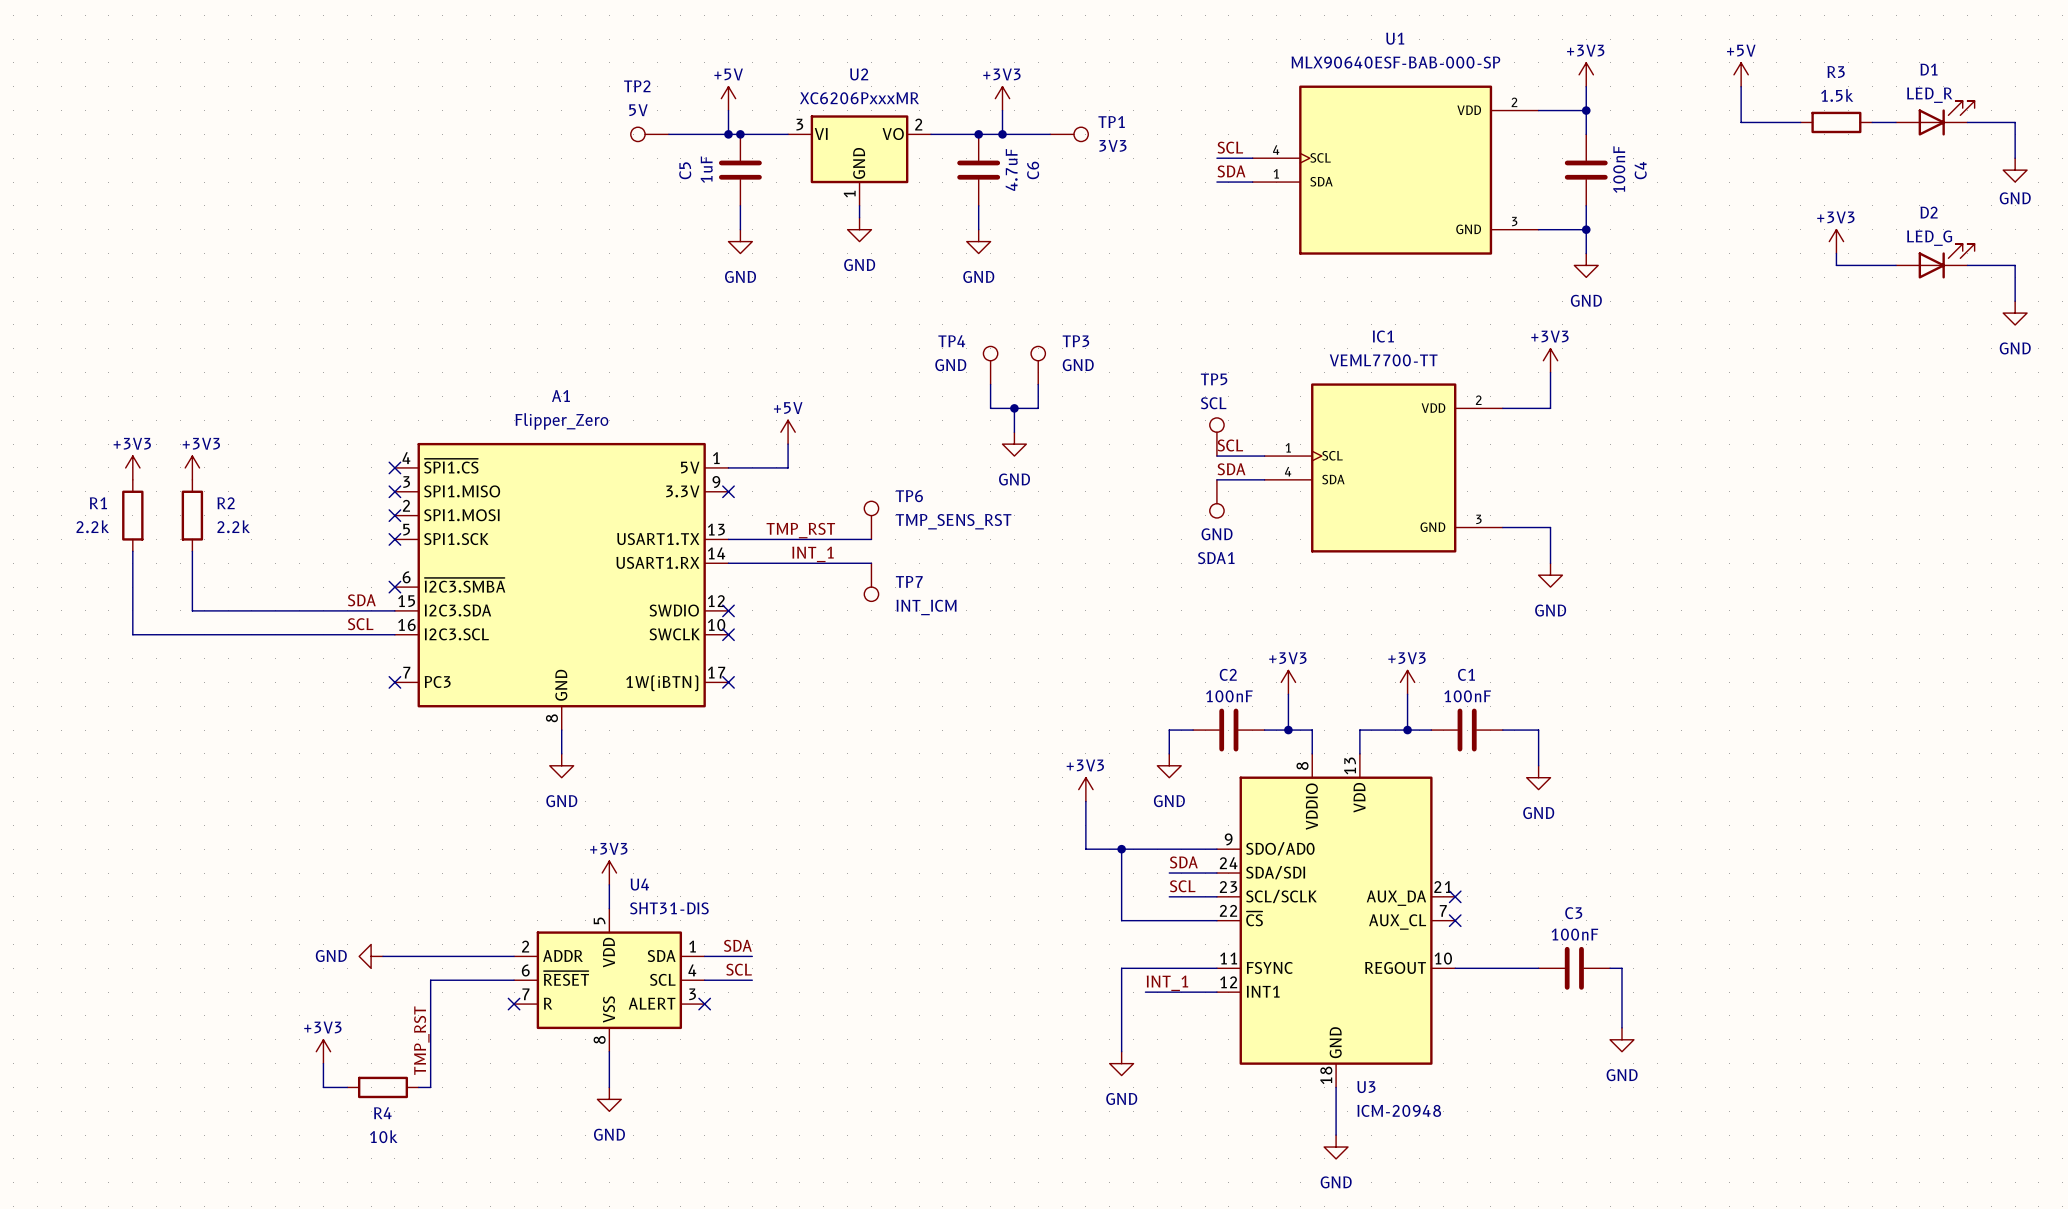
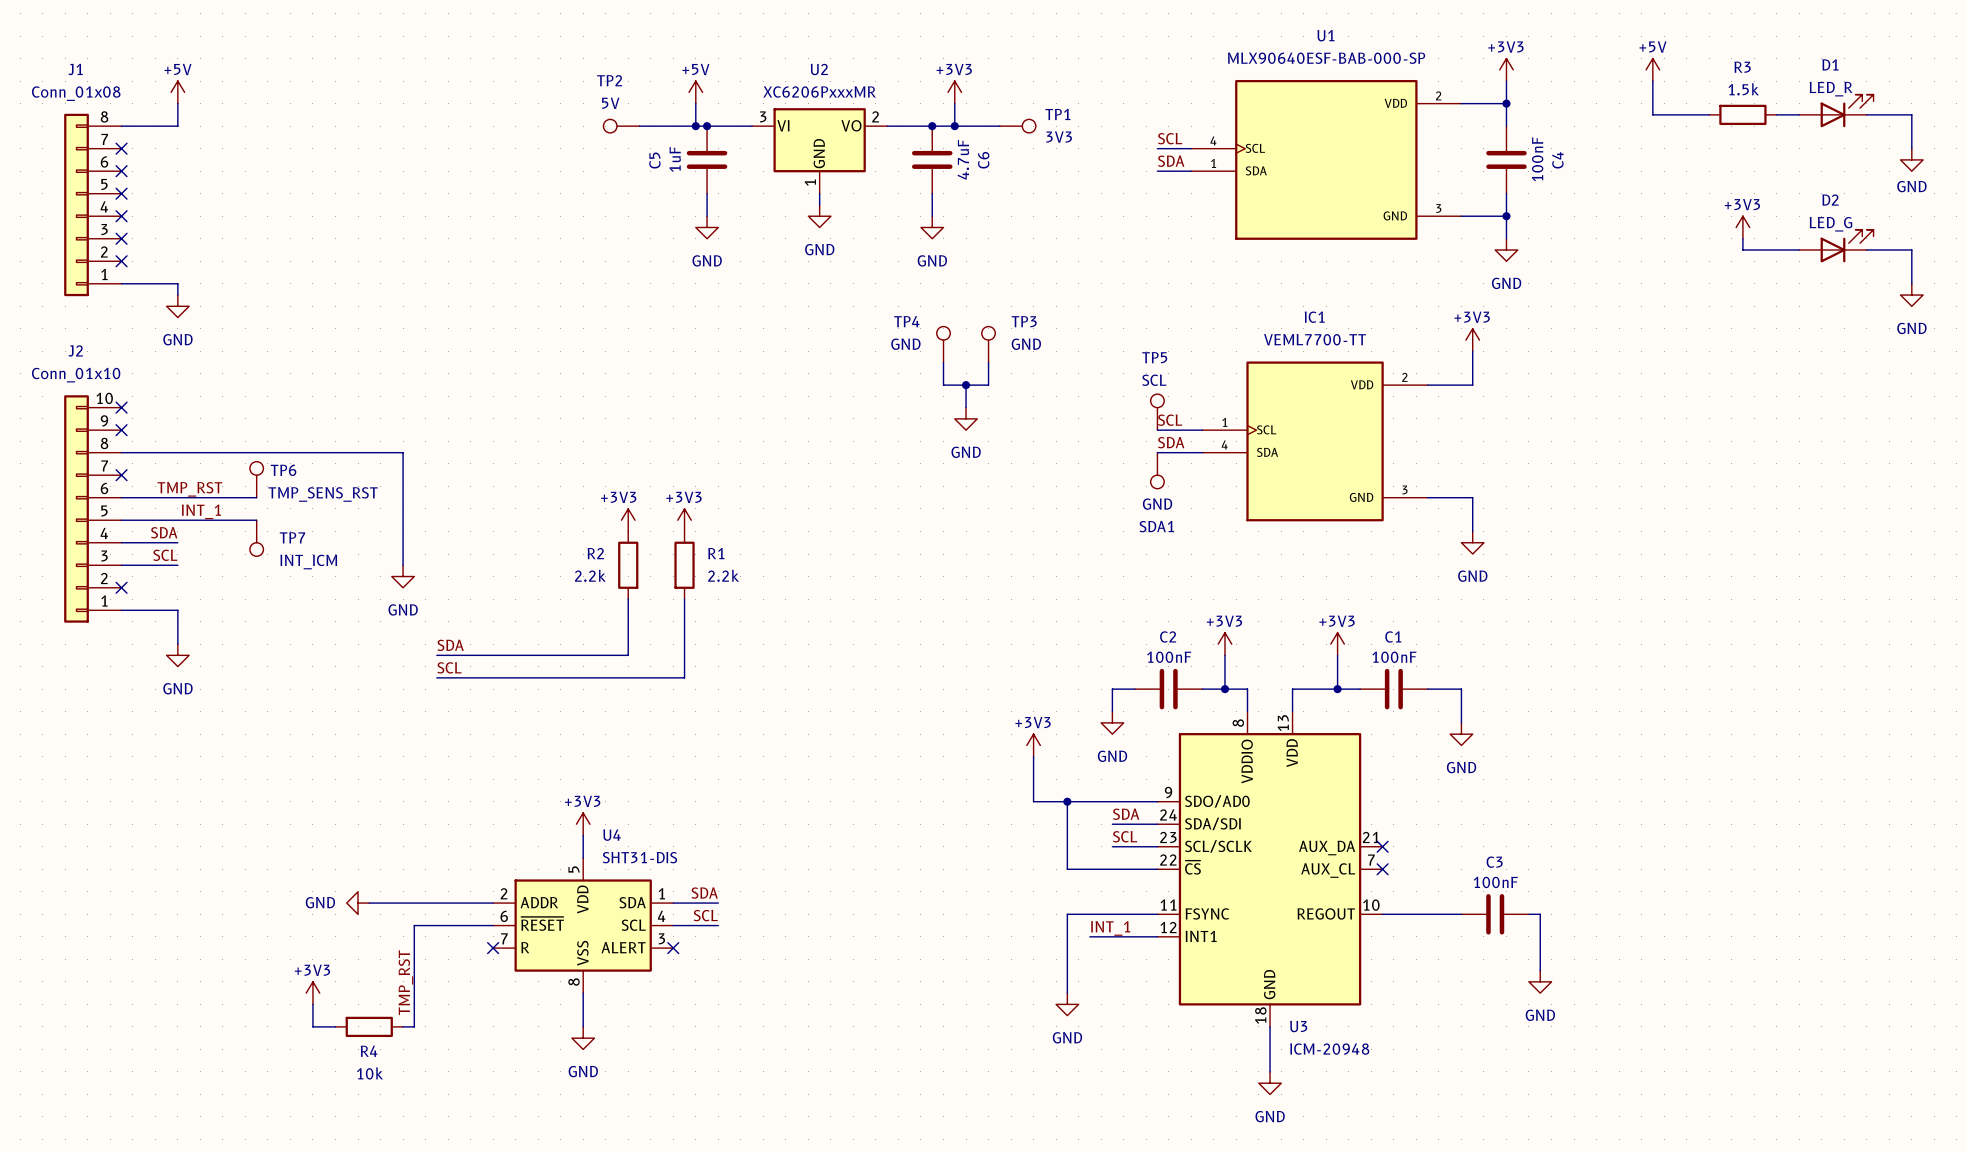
power symbol: none -> +5V (177, 92)
wire: none -> (177, 103) (177, 126) (121, 126)
no-connect mark: none -> (121, 148)
no-connect mark: none -> (121, 171)
no-connect mark: none -> (121, 193)
J1: none -> Conn_01x08 (92, 204)
no-connect mark: none -> (121, 216)
no-connect mark: none -> (121, 238)
no-connect mark: none -> (121, 261)
wire: none -> (121, 283) (177, 283) (177, 295)
power symbol: none -> GND (177, 306)
no-connect mark: none -> (121, 407)
power symbol: +5V (788, 432) -> none
wire: (788, 444) (788, 467) (728, 467) -> none
no-connect mark: none -> (121, 430)
power symbol: +3V3 (132, 467) -> none
power symbol: +3V3 (192, 467) -> none
no-connect mark: (394, 467) -> none
wire: none -> (121, 452) (403, 452) (403, 565)
no-connect mark: (394, 491) -> none
no-connect mark: (728, 491) -> none
TP6 name position: TP6 (909, 496) -> TP6 (283, 470)
R1 name position: R1 (98, 503) -> R1 (716, 553)
no-connect mark: none -> (121, 475)
R2 name position: R2 (226, 503) -> R2 (595, 553)
R1 position: (132, 515) -> (684, 565)
R2 position: (192, 515) -> (628, 565)
no-connect mark: (394, 515) -> none
label: none -> TMP_RST (189, 489)
TP6 position: (871, 520) -> (256, 479)
TP6 value position: TMP_SENS_RST (953, 521) -> TMP_SENS_RST (323, 494)
R1 value position: 2.2k (92, 526) -> 2.2k (723, 575)
R2 value position: 2.2k (233, 526) -> 2.2k (590, 575)
wire: none -> (121, 497) (256, 497)
label: TMP_RST (800, 530) -> none
J2: none -> Conn_01x10 (92, 508)
no-connect mark: (394, 539) -> none
wire: (728, 539) (871, 539) -> none
label: none -> INT_1 (201, 511)
wire: none -> (121, 520) (256, 520)
wire: (132, 551) (132, 634) (394, 634) -> none
wire: (192, 551) (192, 610) (394, 610) -> none
power symbol: none -> +3V3 (628, 520)
power symbol: none -> +3V3 (684, 520)
label: INT_1 (813, 554) -> none
wire: (728, 563) (871, 563) -> none
label: none -> SDA (164, 532)
wire: none -> (121, 542) (177, 542)
TP7 position: (871, 582) -> (256, 538)
A1: Flipper_Zero (561, 586) -> none
no-connect mark: (394, 587) -> none
label: none -> SCL (165, 555)
wire: none -> (121, 565) (177, 565)
label: SDA (361, 600) -> none
power symbol: none -> GND (403, 576)
no-connect mark: (728, 610) -> none
no-connect mark: none -> (121, 587)
label: SCL (360, 624) -> none
wire: none -> (684, 599) (684, 677) (436, 677)
no-connect mark: (728, 634) -> none
wire: none -> (121, 610) (177, 610) (177, 644)
no-connect mark: (394, 682) -> none
no-connect mark: (728, 682) -> none
label: none -> SDA (450, 645)
power symbol: none -> GND (177, 655)
label: none -> SCL (449, 667)
wire: (561, 730) (561, 753) -> none
power symbol: GND (561, 765) -> none

